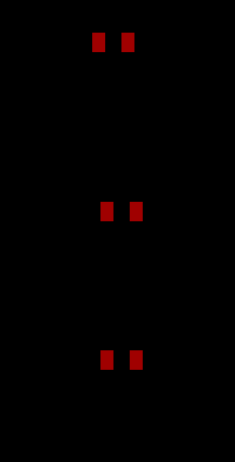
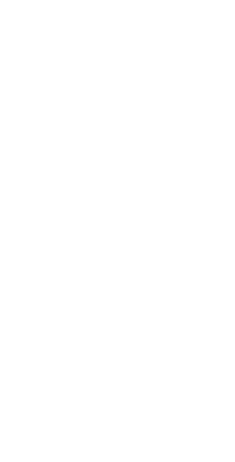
part: (113, 42) -> none
part: (121, 211) -> none
part: (121, 360) -> none

